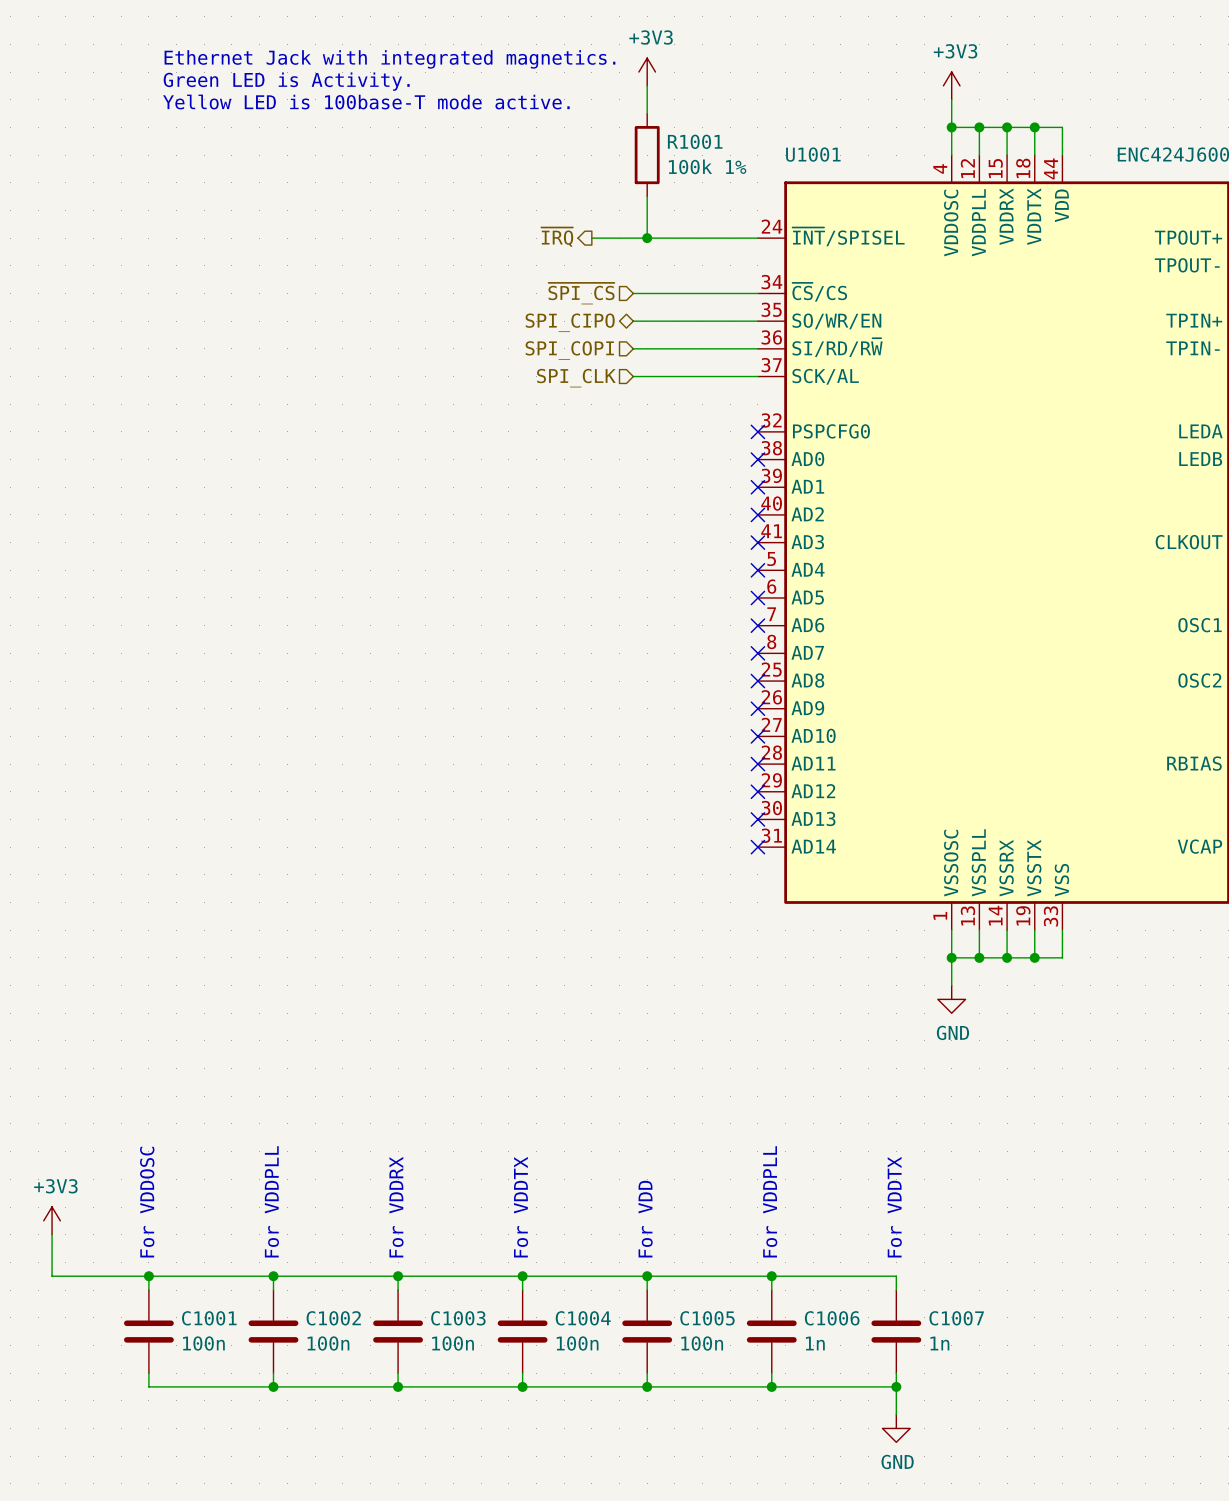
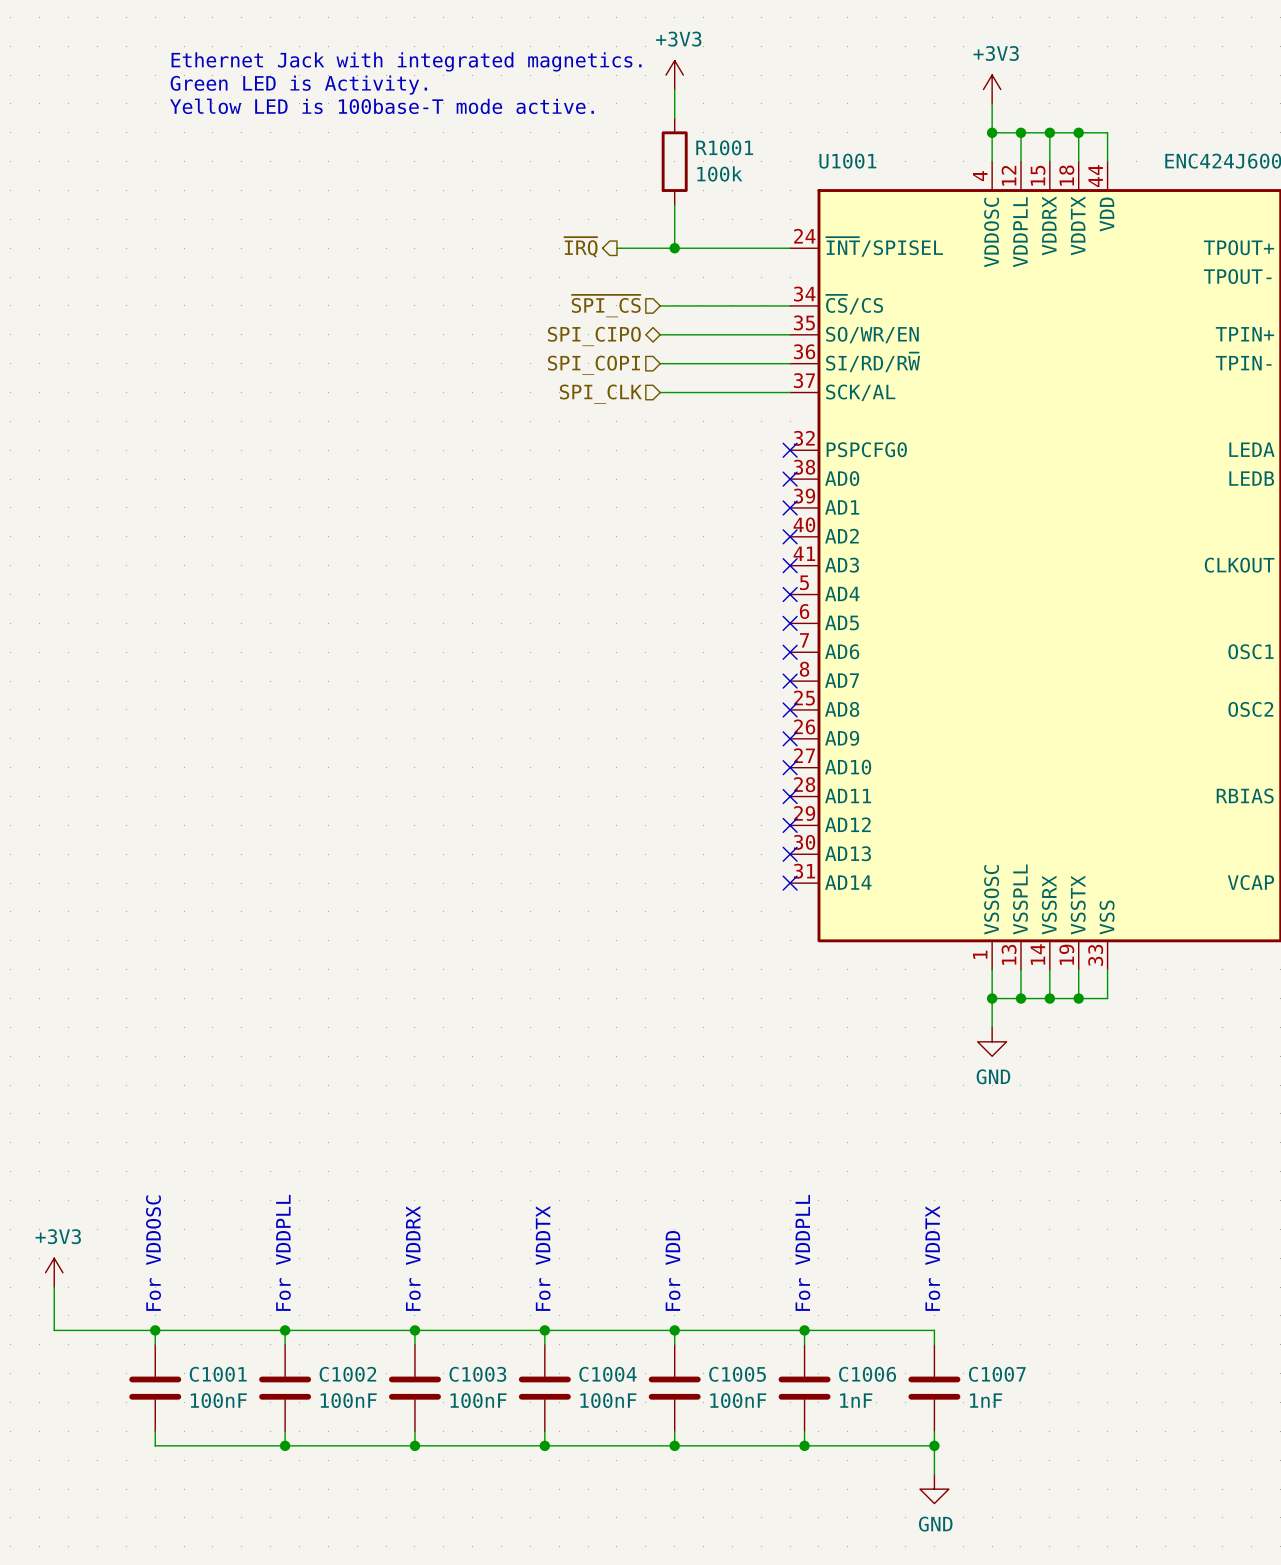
R1001 value: 100k 1% (707, 166) -> 100k (719, 173)
C1001 value: 100n (203, 1343) -> 100nF (218, 1400)
C1002 value: 100n (328, 1343) -> 100nF (348, 1400)
C1003 value: 100n (453, 1343) -> 100nF (478, 1400)
C1004 value: 100n (577, 1343) -> 100nF (608, 1400)
C1005 value: 100n (702, 1343) -> 100nF (738, 1400)
C1006 value: 1n (815, 1343) -> 1nF (856, 1400)
C1007 value: 1n (939, 1343) -> 1nF (986, 1400)

